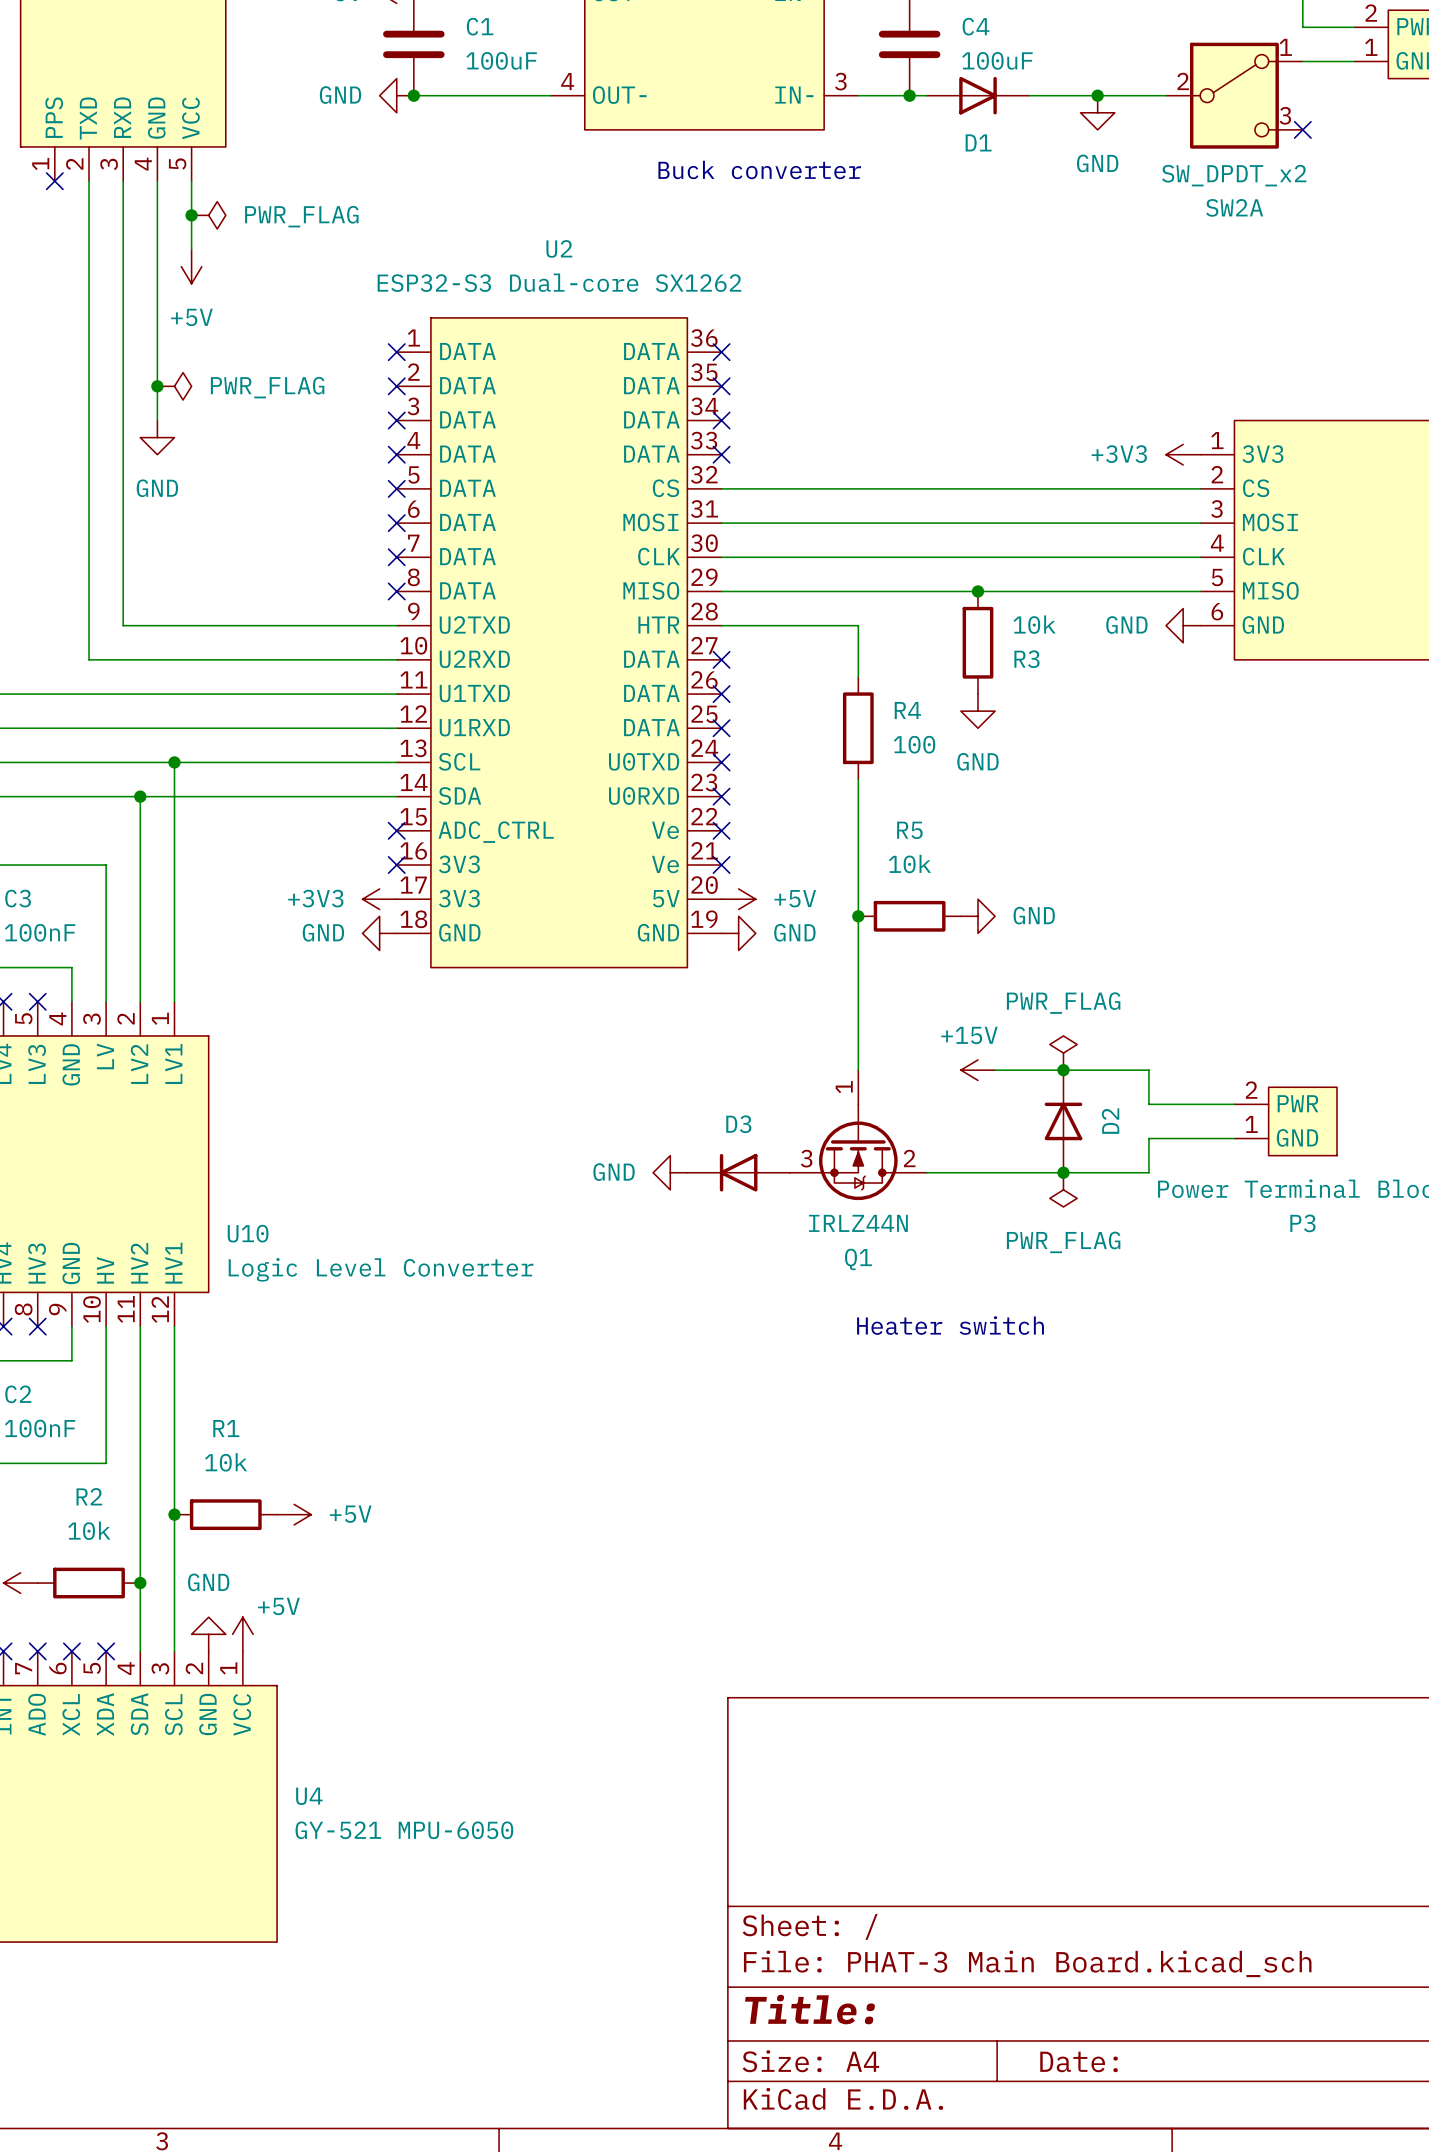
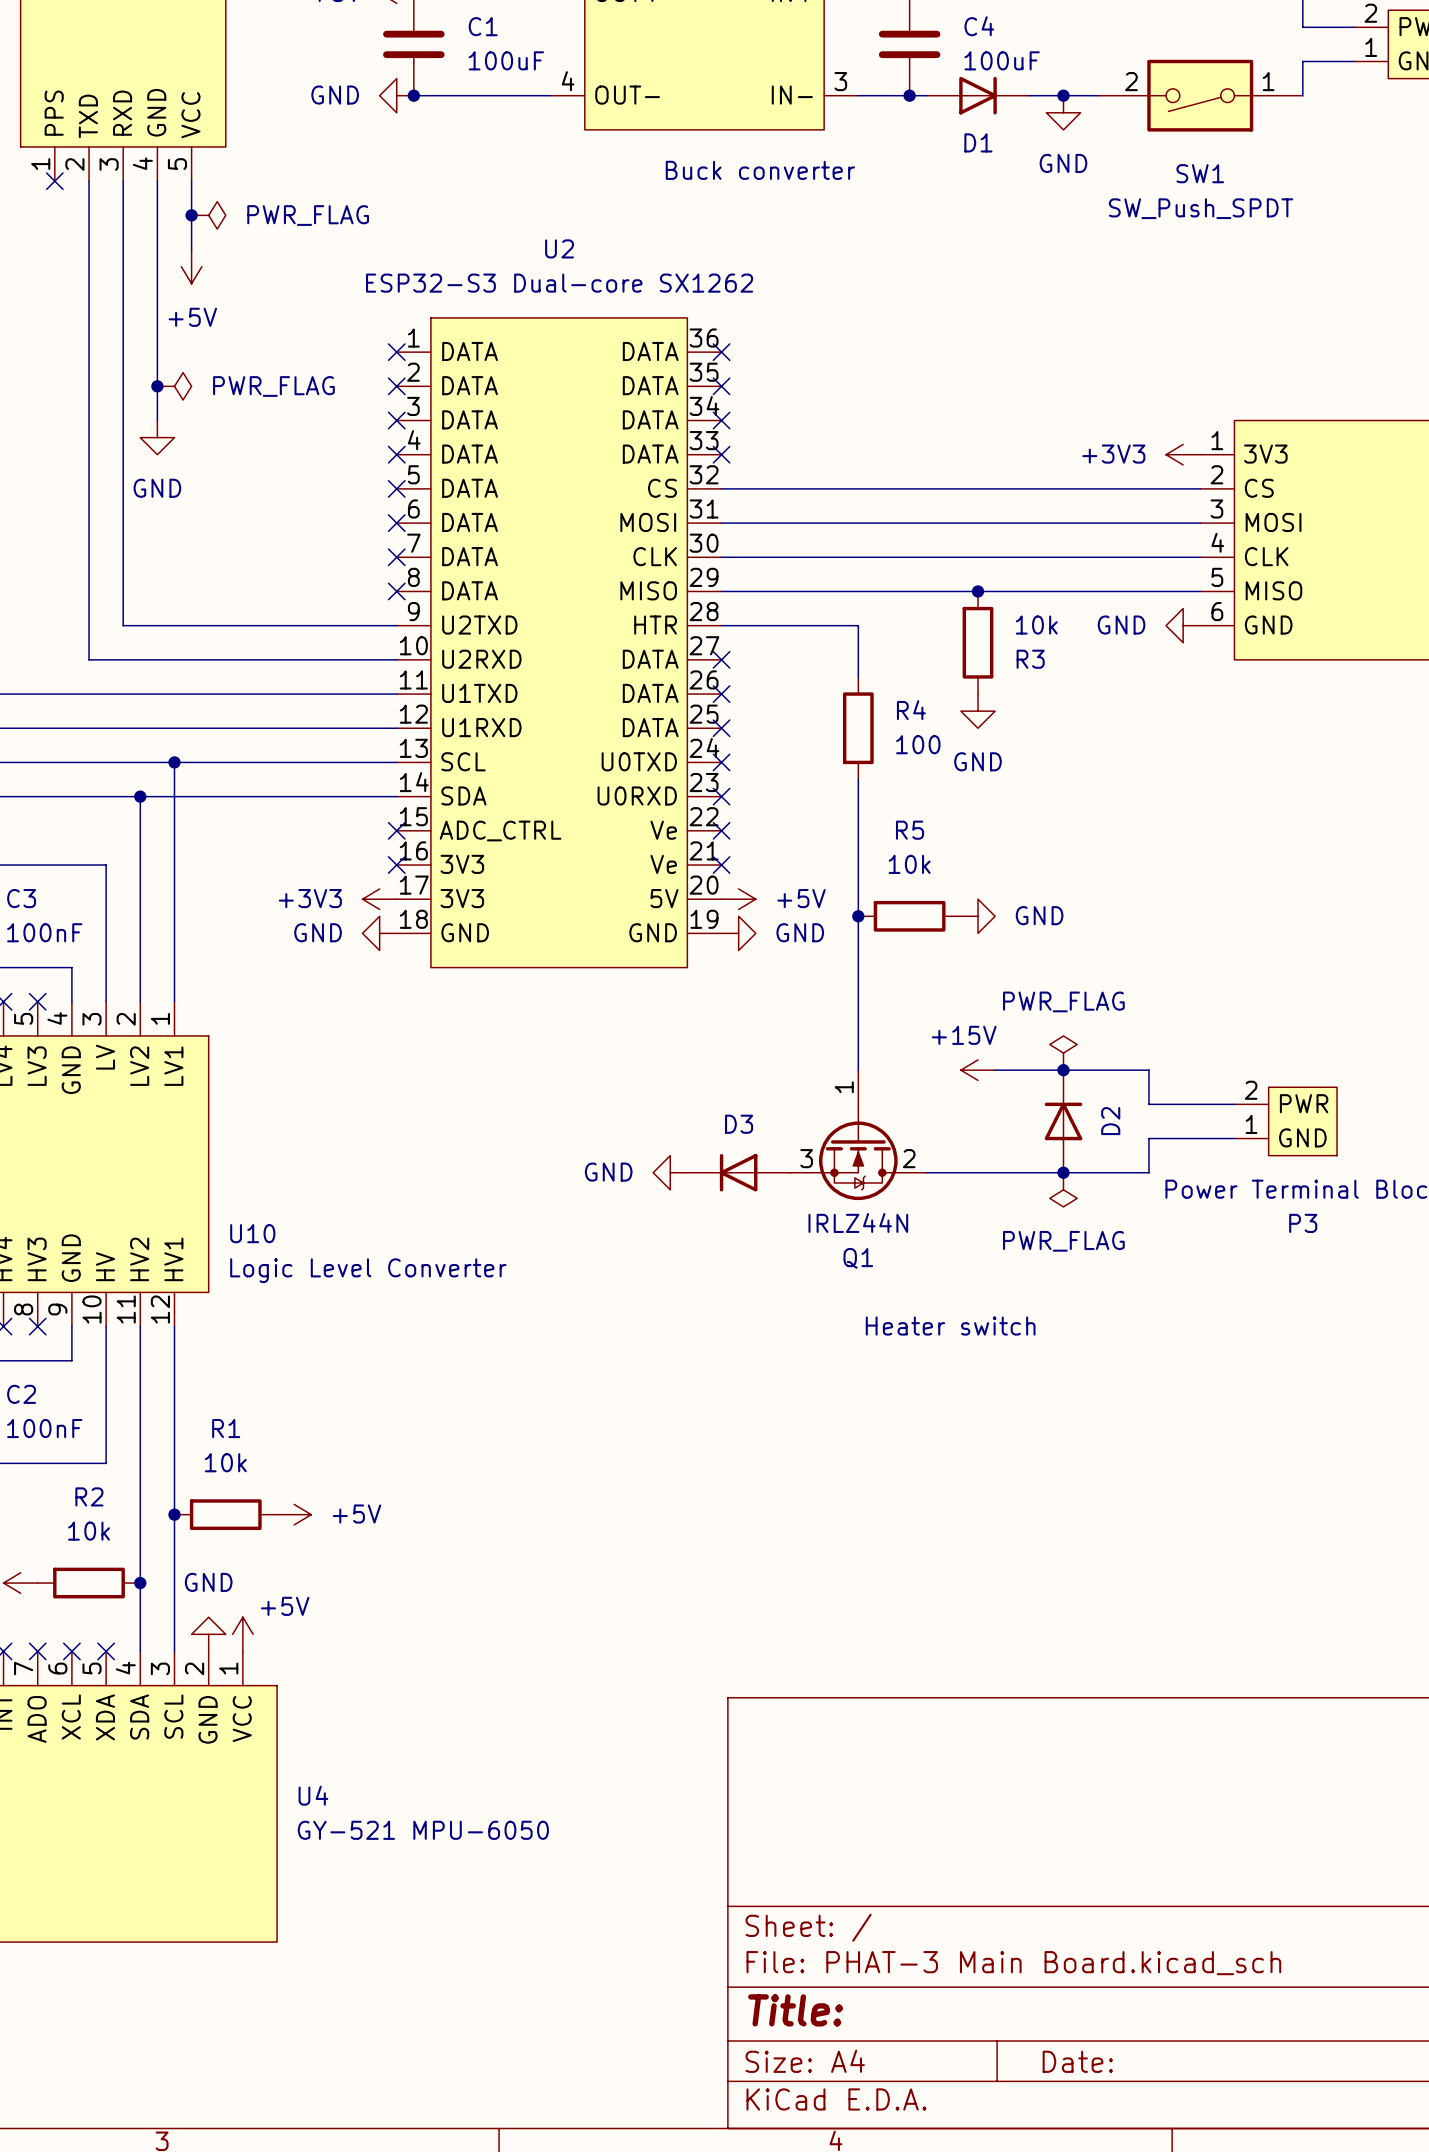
wire: none -> (1302, 61) (1302, 95)
junction position: (1097, 95) -> (1063, 95)
SW1: none -> SW_Push_SPDT (1200, 95)
SW2A: SW_DPDT_x2 (1234, 95) -> none
power symbol position: GND (1097, 112) -> GND (1063, 112)
no-connect mark: (1302, 129) -> none

